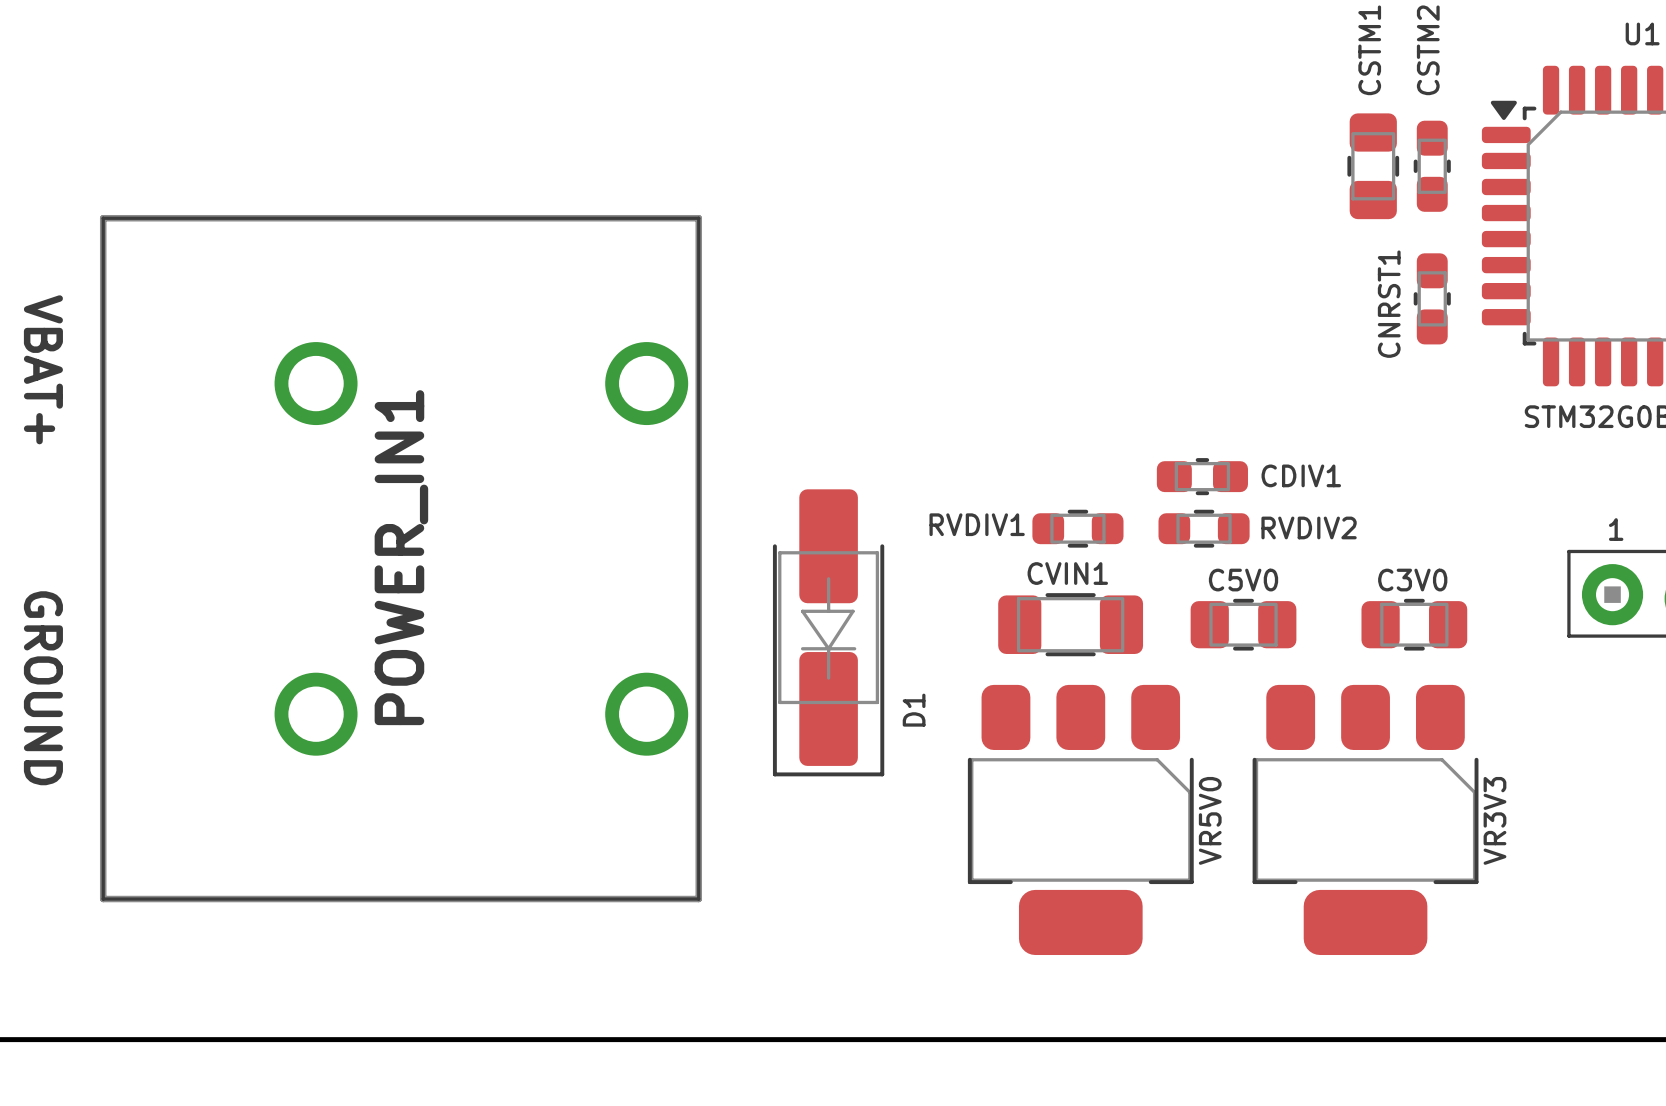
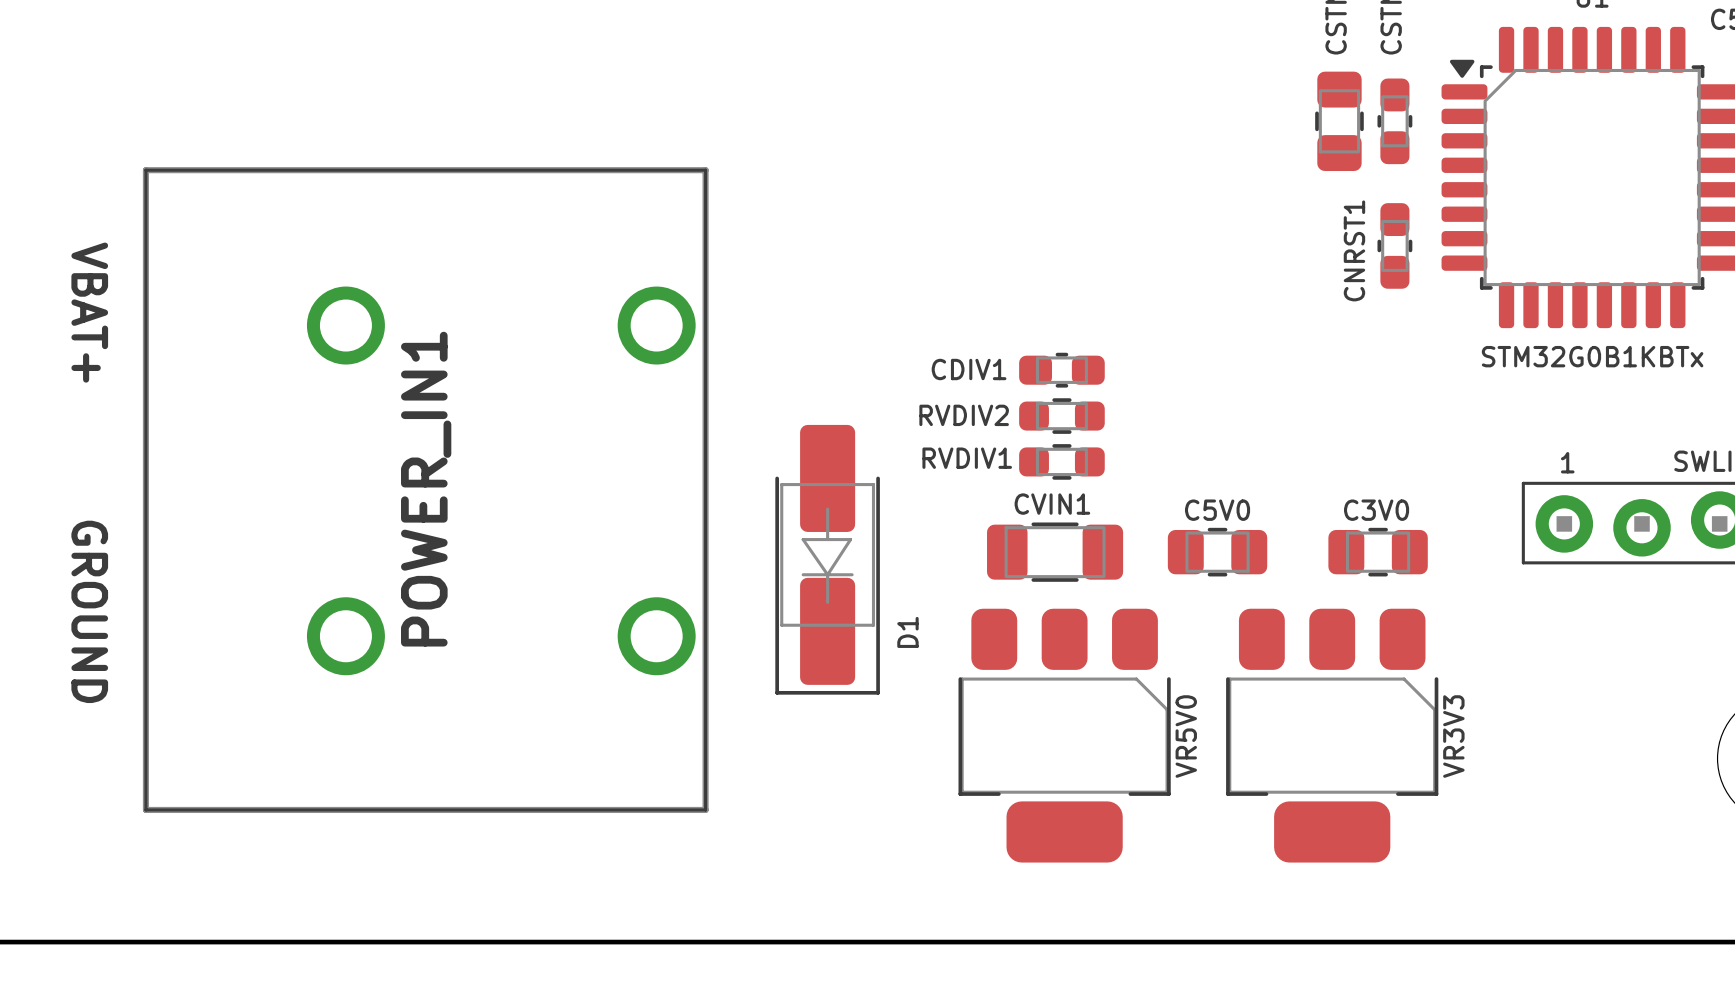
CDIV1 name position: CDIV1 (1301, 475) -> CDIV1 (969, 369)
CDIV1 position: (1202, 476) -> (1061, 370)
RVDIV2 name position: RVDIV2 (1309, 527) -> RVDIV2 (964, 415)
RVDIV2 position: (1204, 528) -> (1061, 416)

